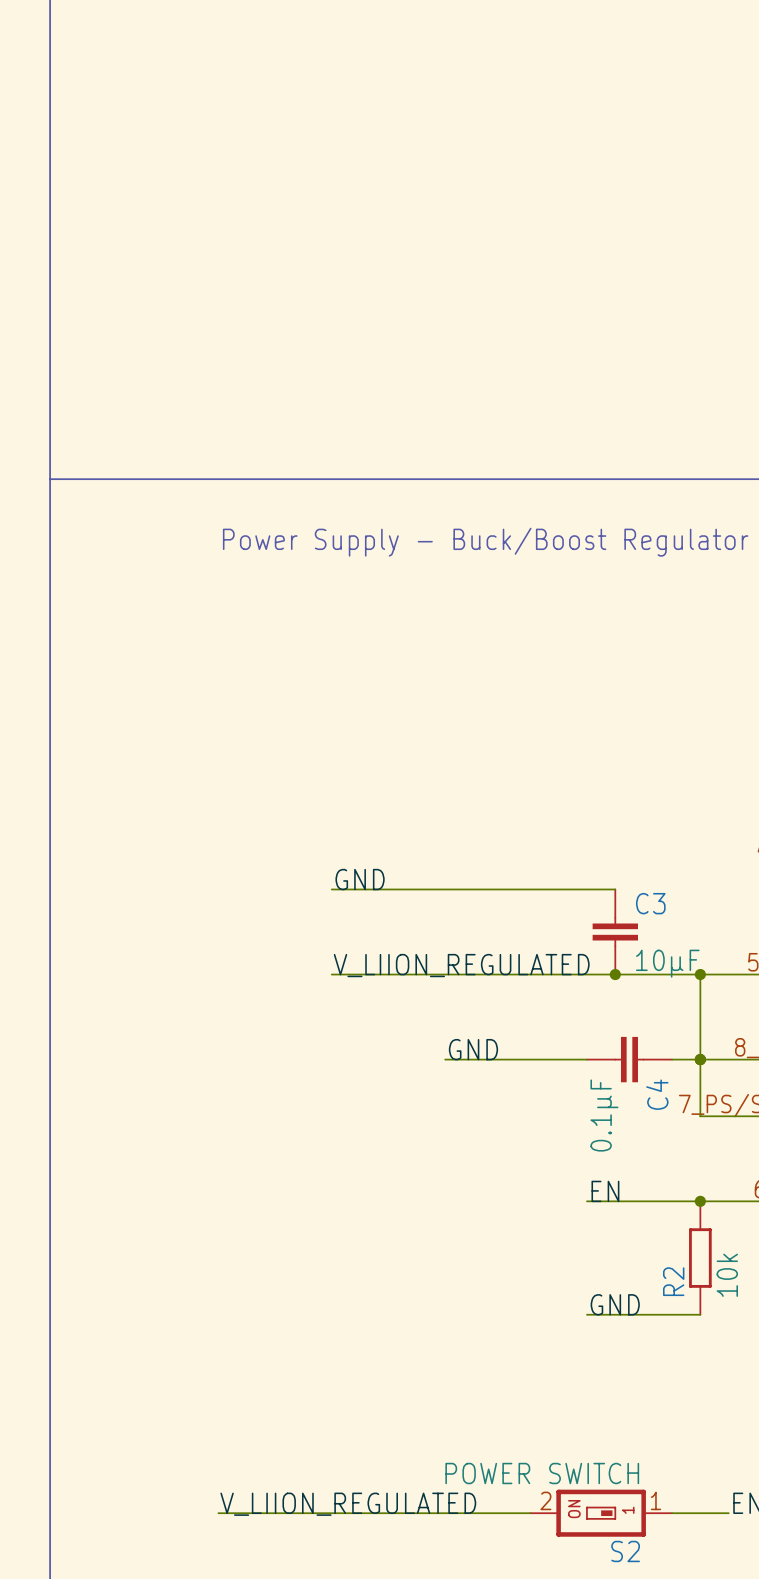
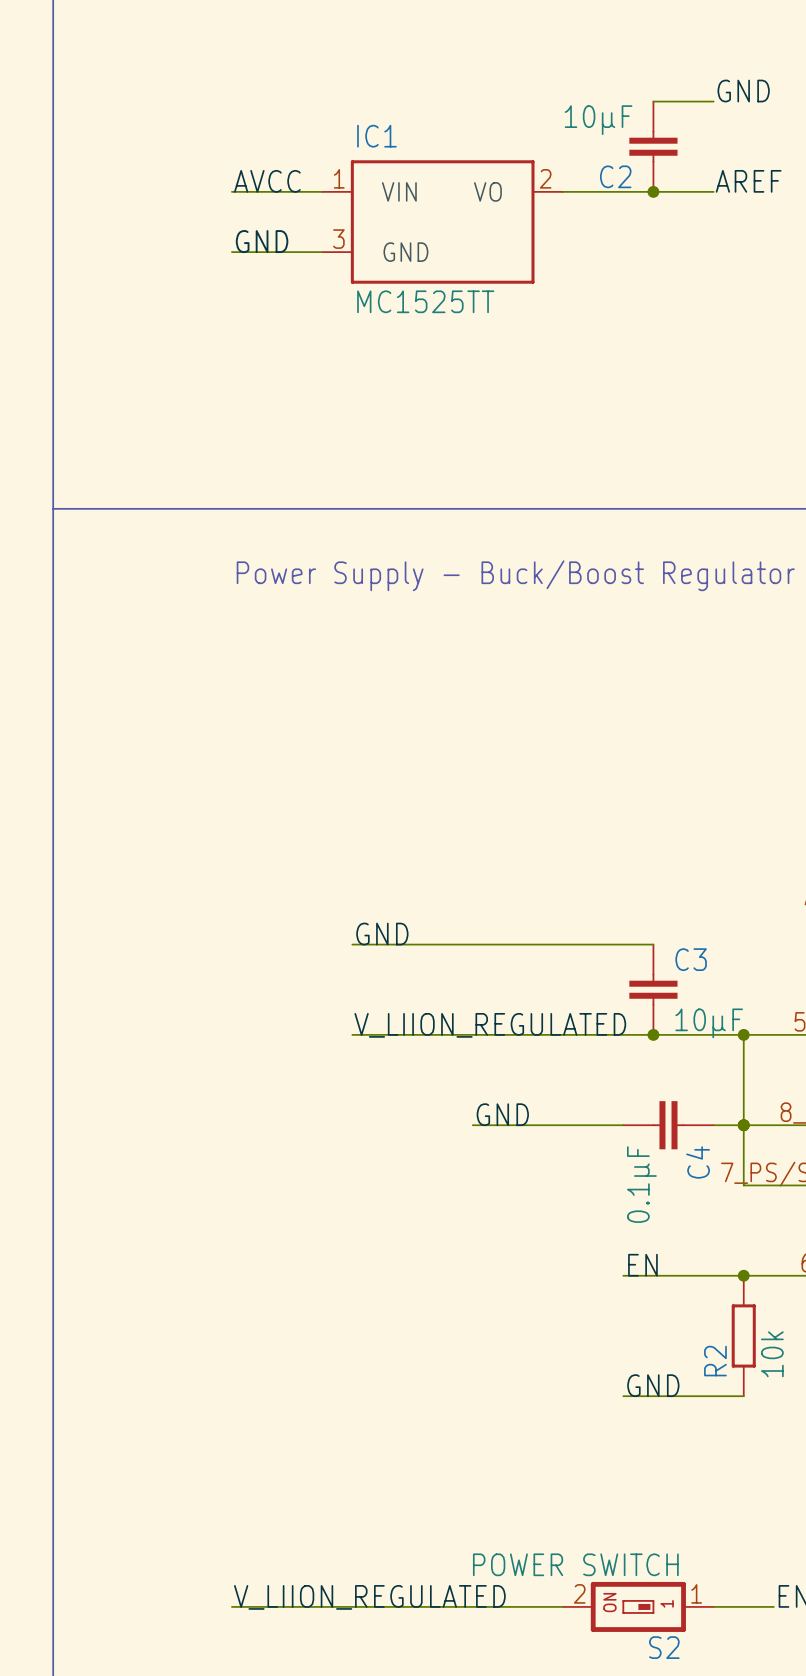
label: none -> GND (743, 91)
wire: none -> (653, 101) (713, 101)
C2: none -> 10µF (653, 146)
label: none -> AVCC (267, 181)
label: none -> AREF (748, 181)
wire: none -> (231, 191) (322, 191)
wire: none -> (563, 191) (713, 191)
junction: none -> (653, 191)
IC1: none -> MC1525TT (442, 221)
label: none -> GND (262, 241)
wire: none -> (231, 252) (322, 252)

